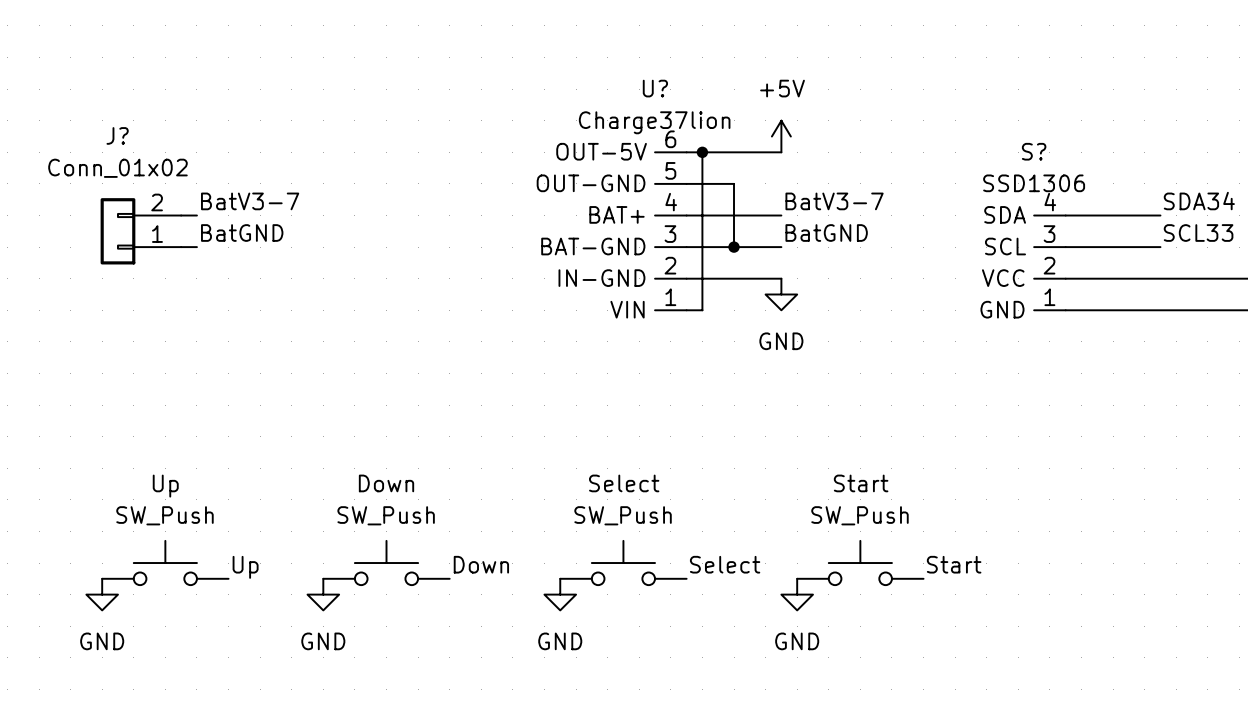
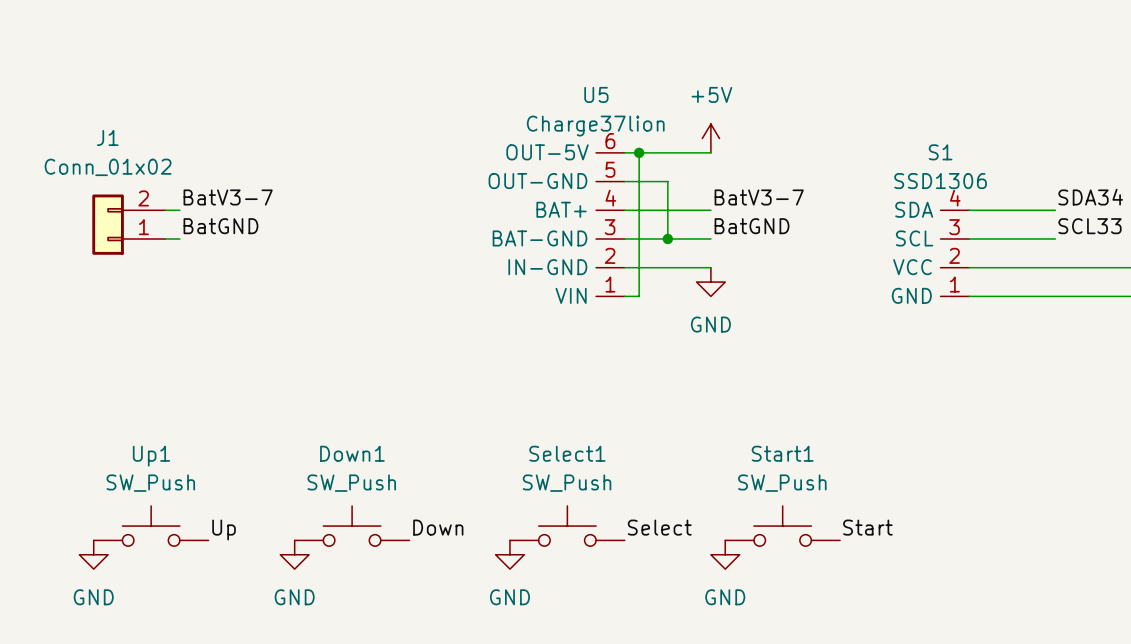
U? name: U? (655, 88) -> U5 (596, 94)
J? name: J? (117, 135) -> J1 (107, 137)
S? name: S? (1034, 151) -> S1 (940, 152)
Down name: Down (386, 483) -> Down1 (352, 453)
Select name: Select (624, 483) -> Select1 (567, 453)
Start name: Start (861, 483) -> Start1 (782, 453)
Up name: Up (165, 486) -> Up1 (151, 456)

